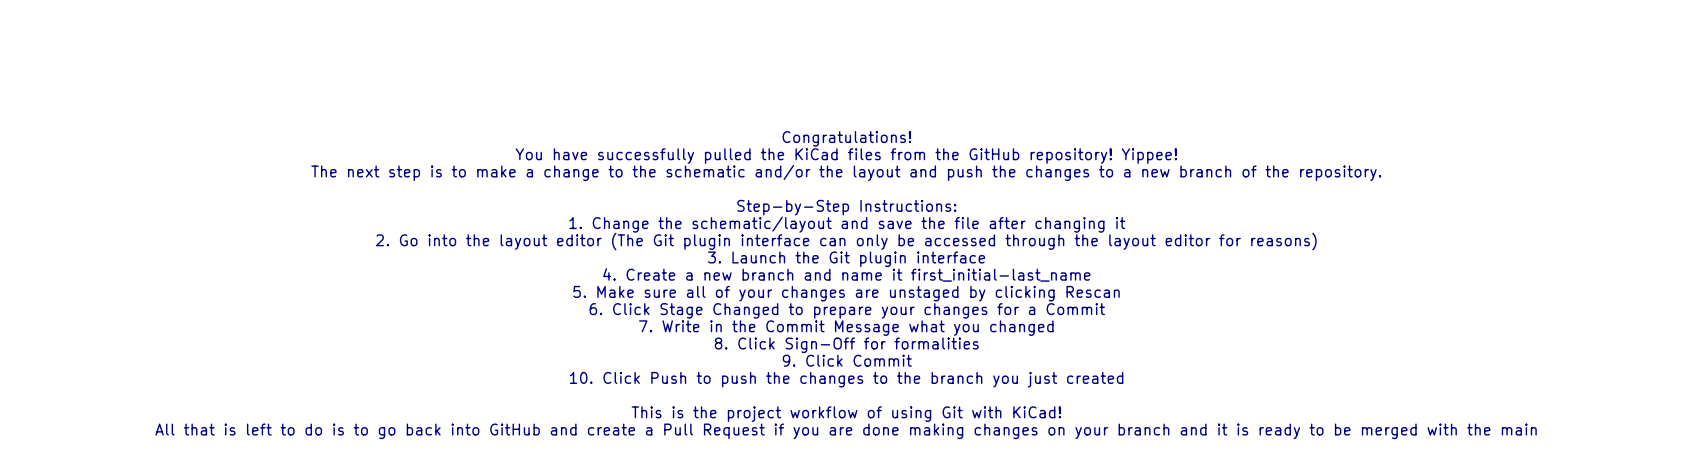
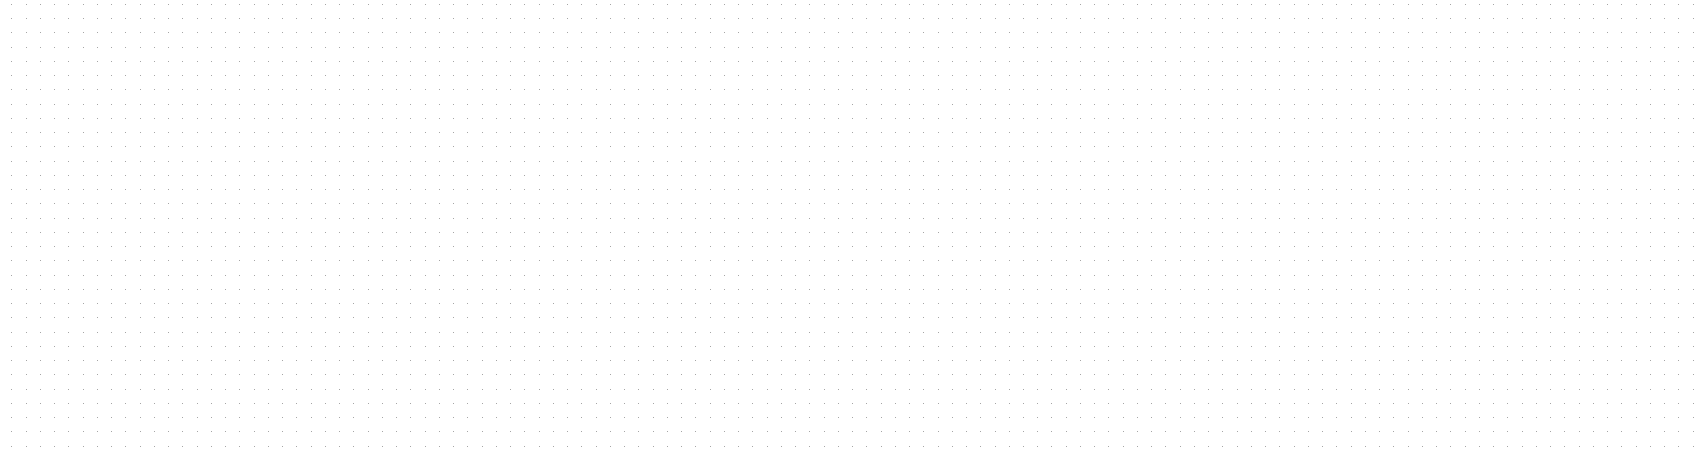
text: Congratulations! (846, 138) -> none
text: You have successfully pulled the KiCad files from the GitHub repository! Yippee! (846, 156) -> none
text: The next step is to make a change to the schematic and/or the layout and push the changes to a new branch of the repository. (846, 172) -> none
text: Step-by-Step Instructions: (846, 207) -> none
text: 1. Change the schematic/layout and save the file after changing it (847, 224) -> none
text: 2. Go into the layout editor (The Git plugin interface can only be accessed through the layout editor for reasons) (846, 241) -> none
text: 3. Launch the Git plugin interface (846, 259) -> none
text: 4. Create a new branch and name it first_initial-last_name (846, 274) -> none
text: 5. Make sure all of your changes are unstaged by clicking Rescan (846, 293) -> none
text: 6. Click Stage Changed to prepare your changes for a Commit (847, 310) -> none
text: 7. Write in the Commit Message what you changed (846, 328) -> none
text: 8. Click Sign-Off for formalities (846, 345) -> none
text: 9. Click Commit (847, 360) -> none
text: 10. Click Push to push the changes to the branch you just created (846, 379) -> none
text: This is the project workflow of using Git with KiCad! (846, 414) -> none
text: All that is left to do is to go back into GitHub and create a Pull Request if you are done making changes on your branch and it is ready to be merged with the main (846, 431) -> none

